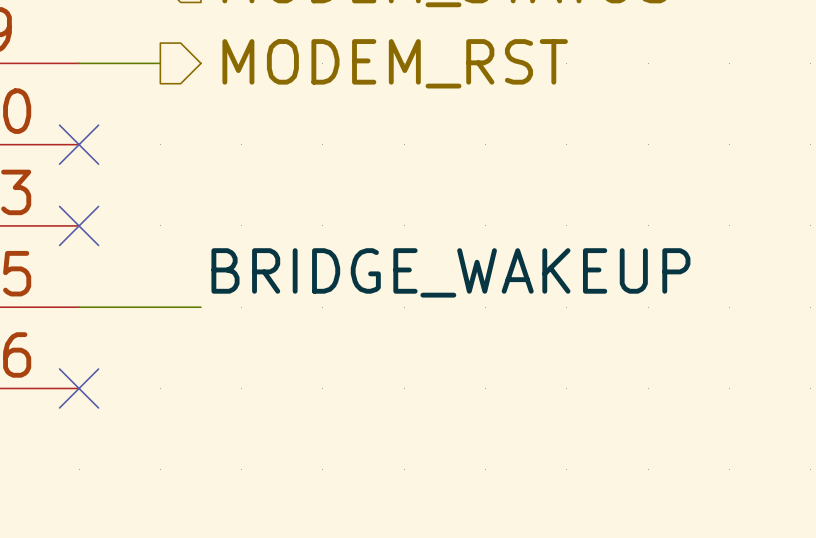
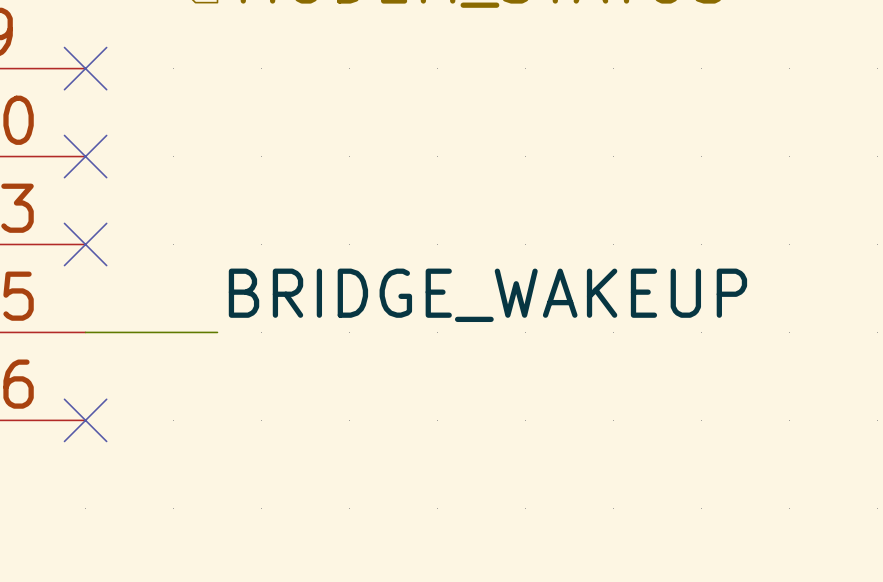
wire: (79, 63) (160, 63) -> none
no-connect mark: none -> (85, 68)
hierarchical label: MODEM_RST (395, 63) -> none

